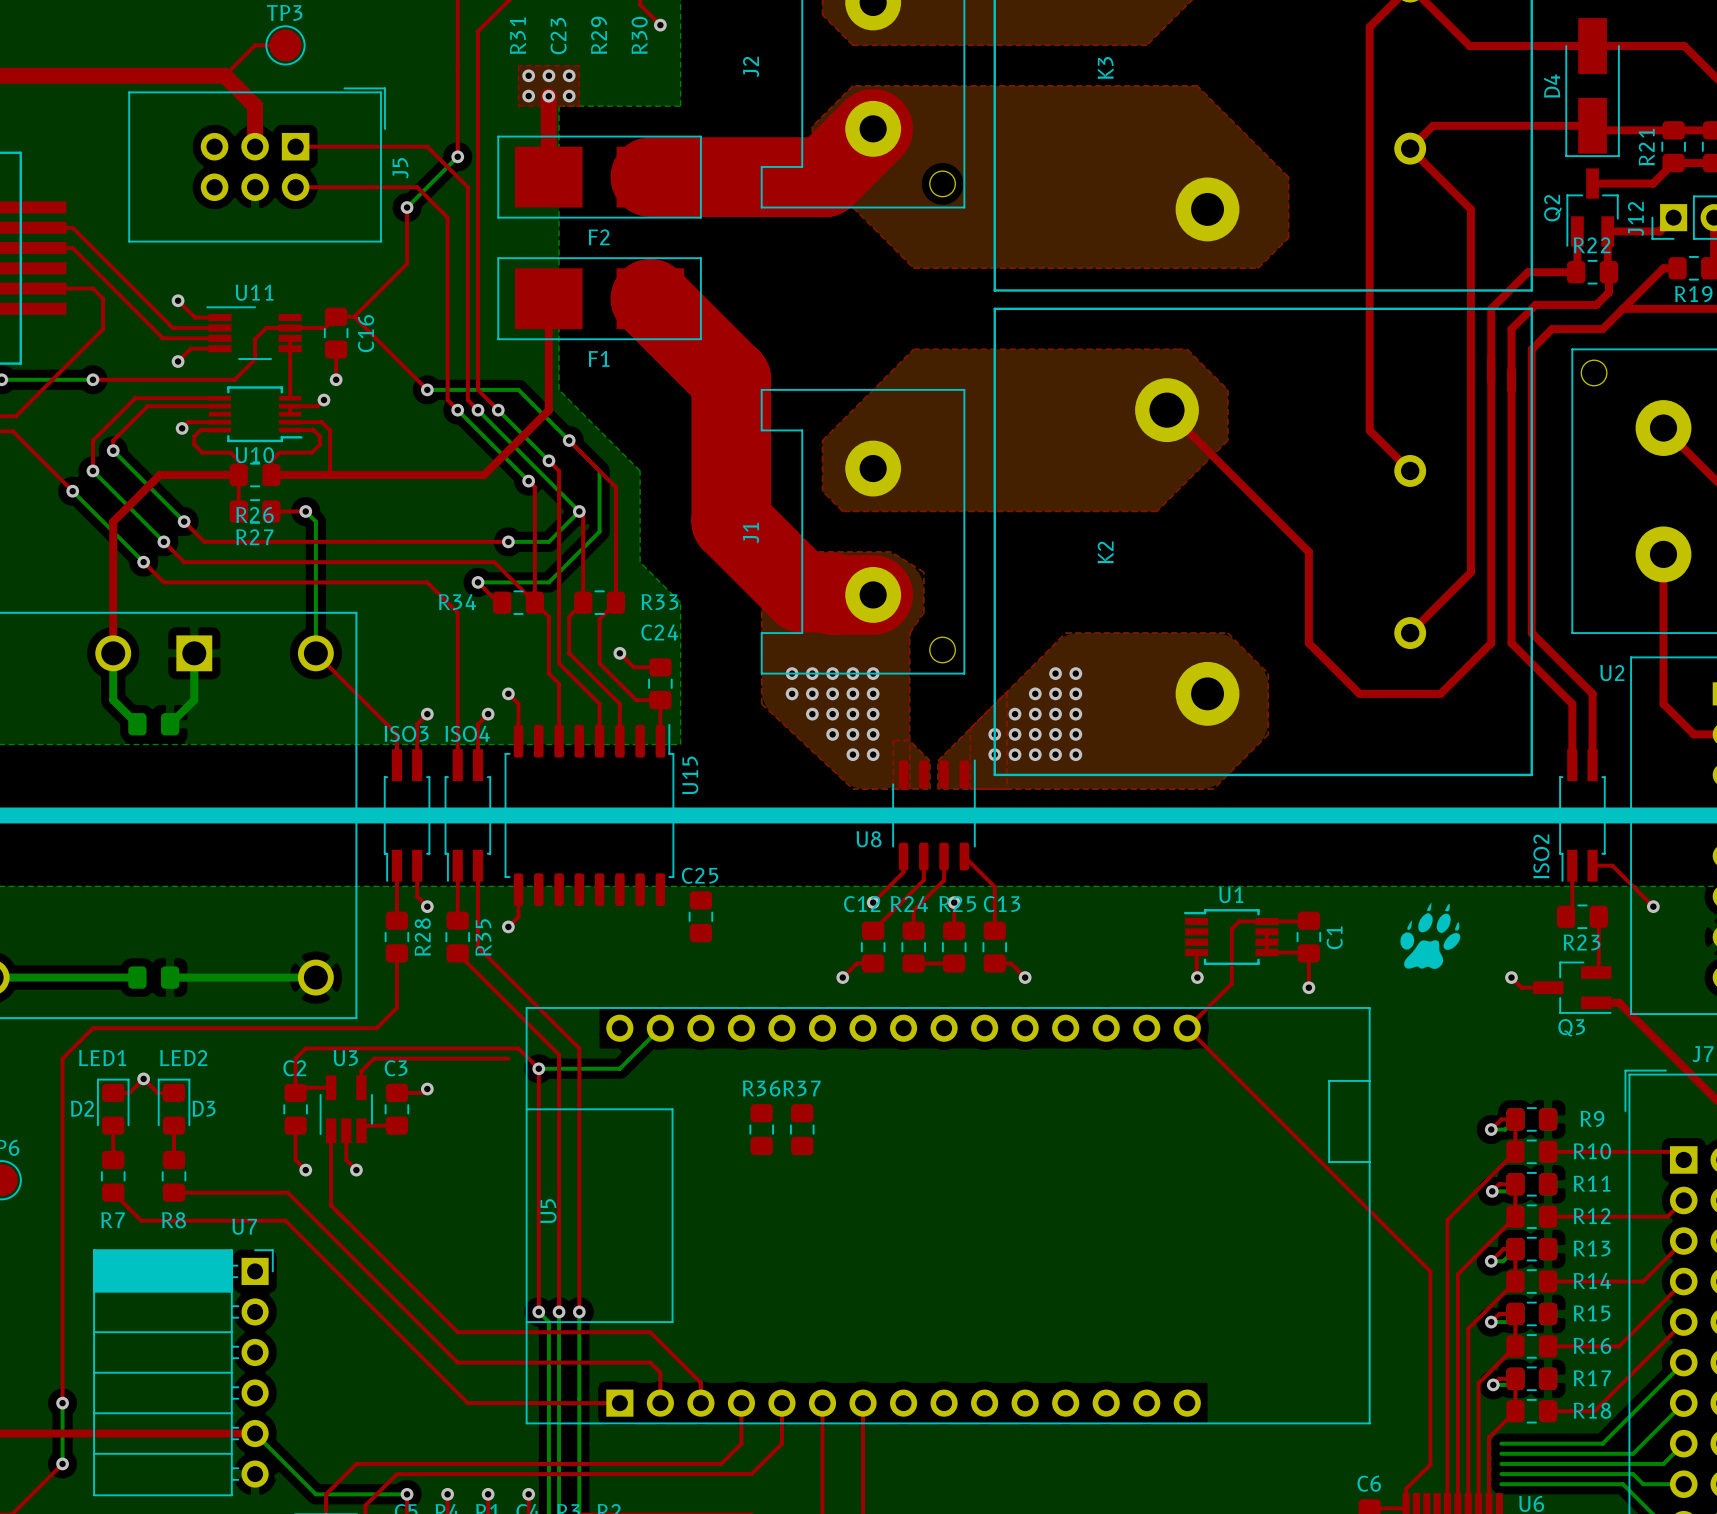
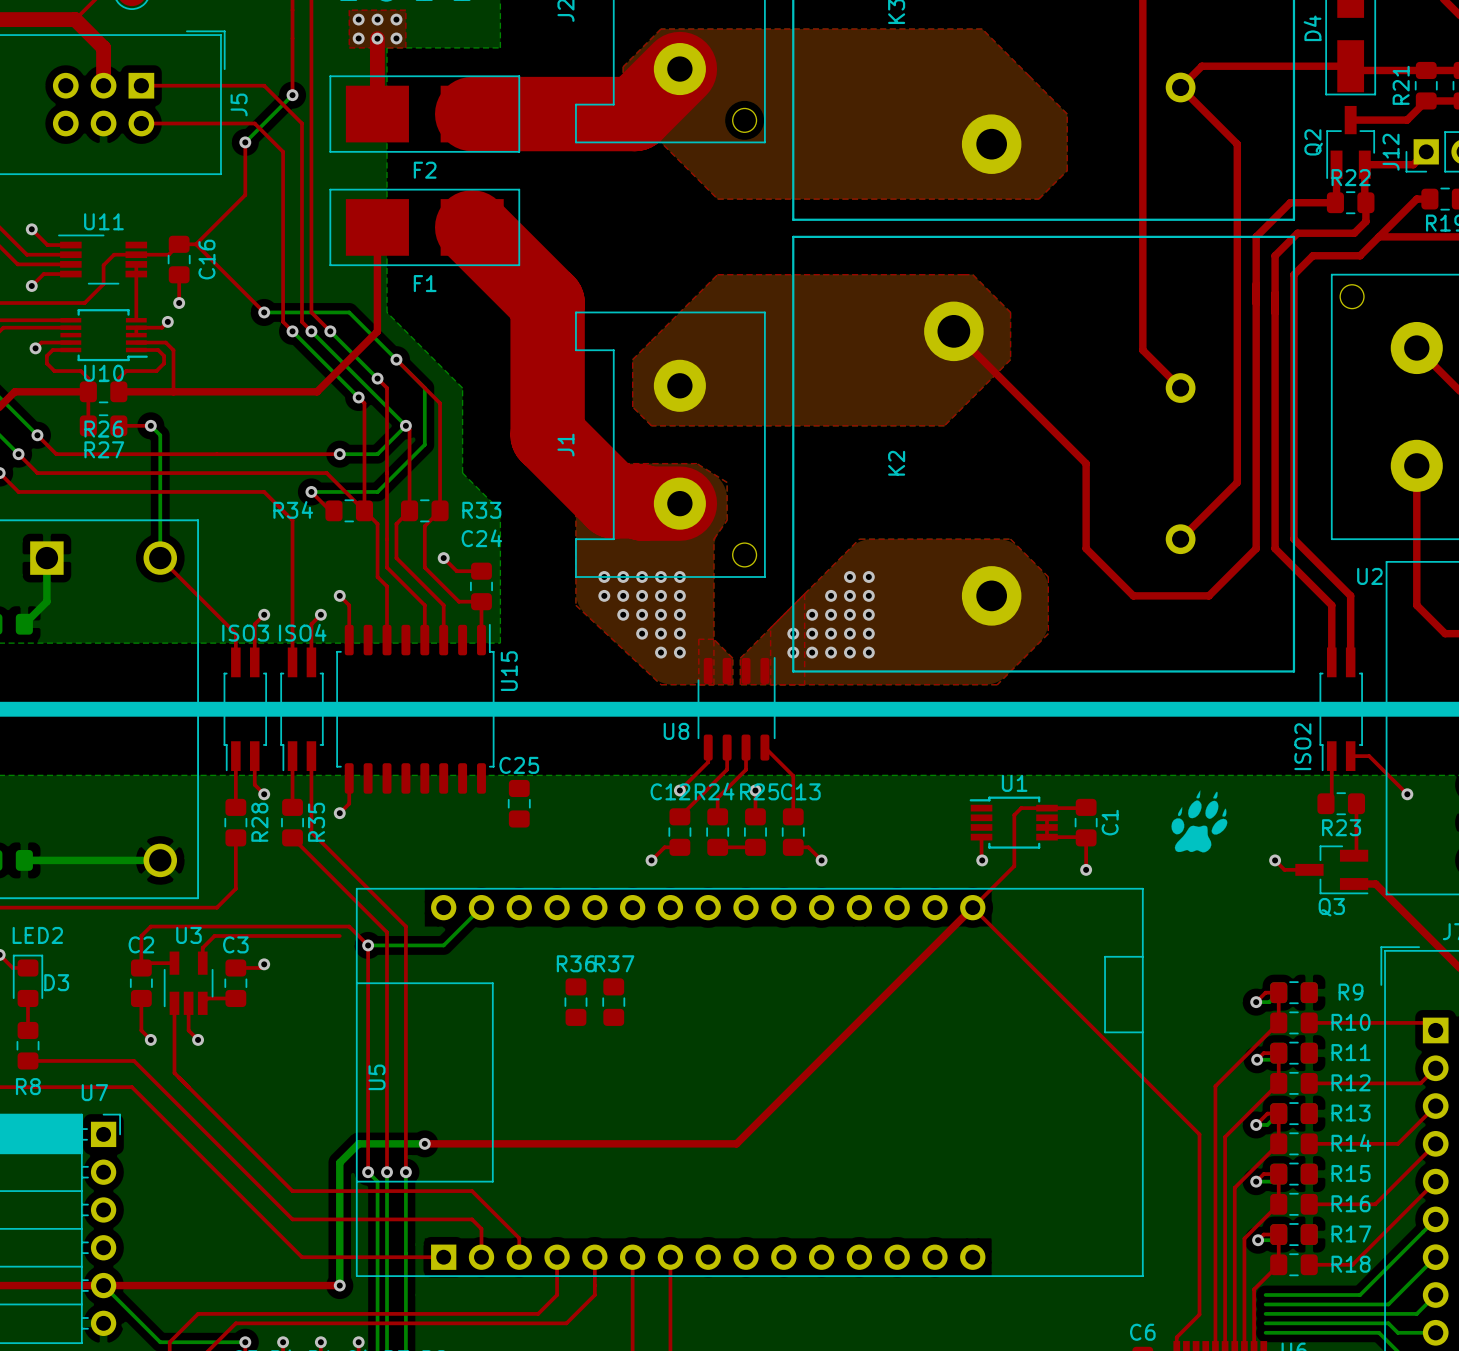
top track: none -> (972, 907) (736, 1143) (424, 1143)
bottom track: none -> (424, 1143) (358, 1143) (339, 1162) (339, 1285)
via: none -> (424, 1143)
top track: none -> (103, 1285) (339, 1285)
via: none -> (339, 1285)

